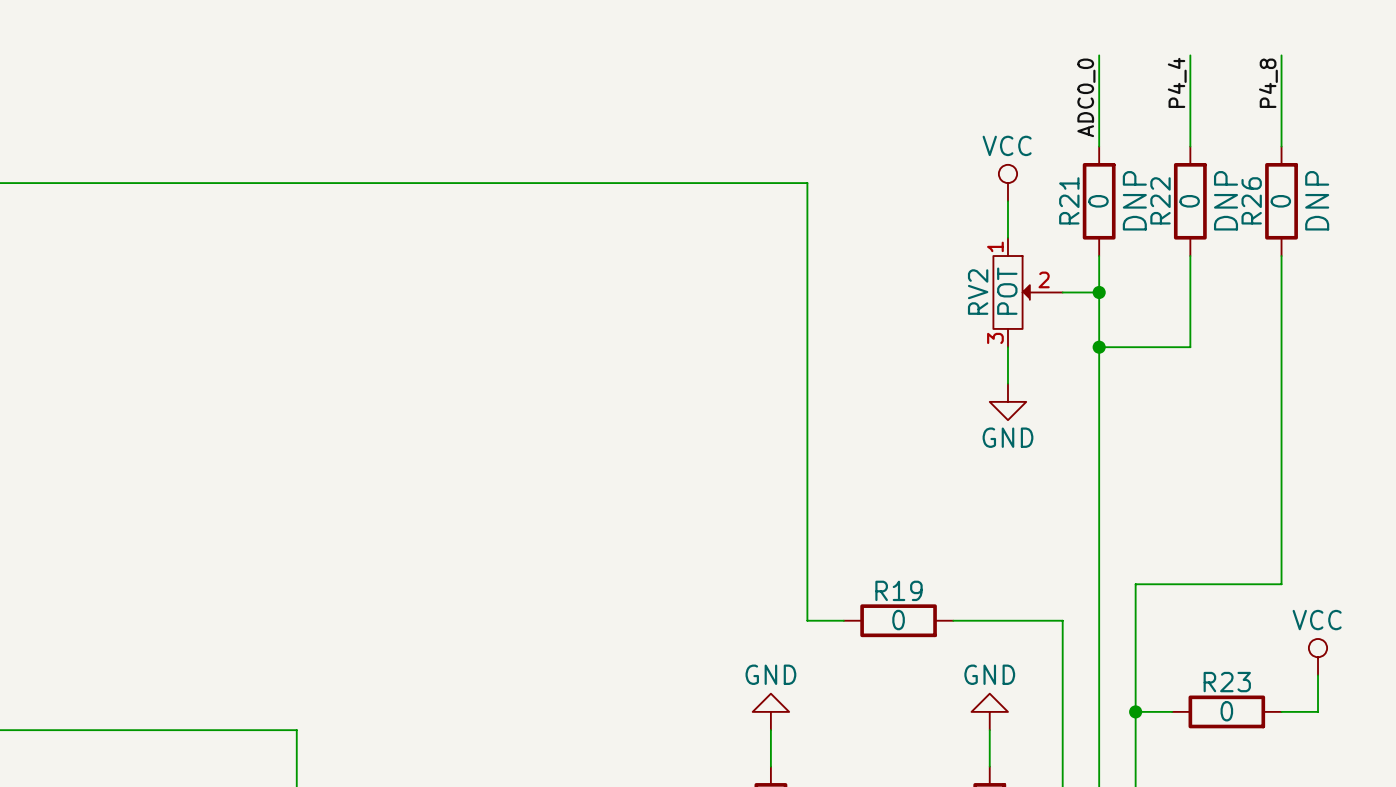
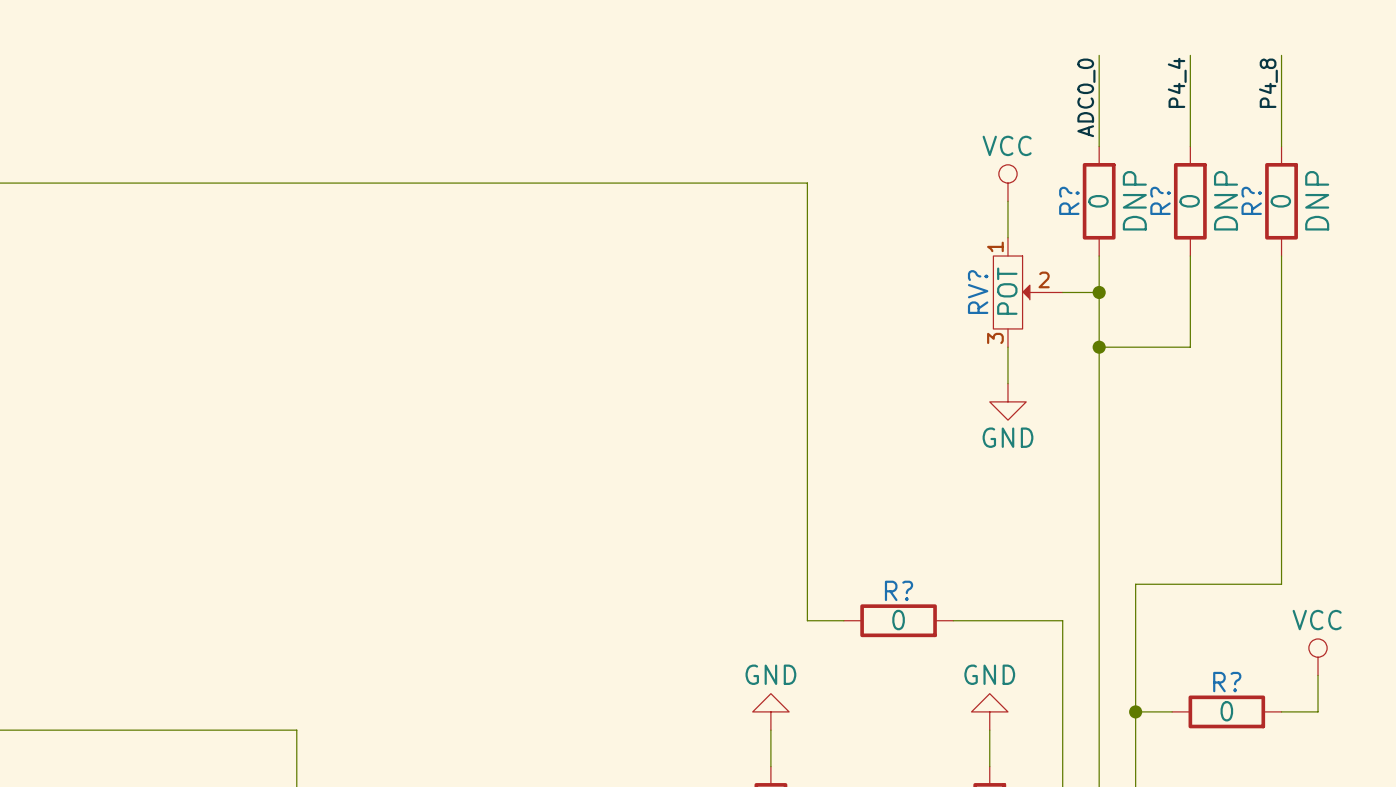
R21 name: R21 (1069, 200) -> R? (1069, 200)
R22 name: R22 (1160, 200) -> R? (1160, 200)
R26 name: R26 (1251, 200) -> R? (1251, 200)
RV2 name: RV2 (978, 292) -> RV? (978, 292)
R19 name: R19 (899, 590) -> R? (899, 590)
R23 name: R23 (1227, 682) -> R? (1227, 682)

